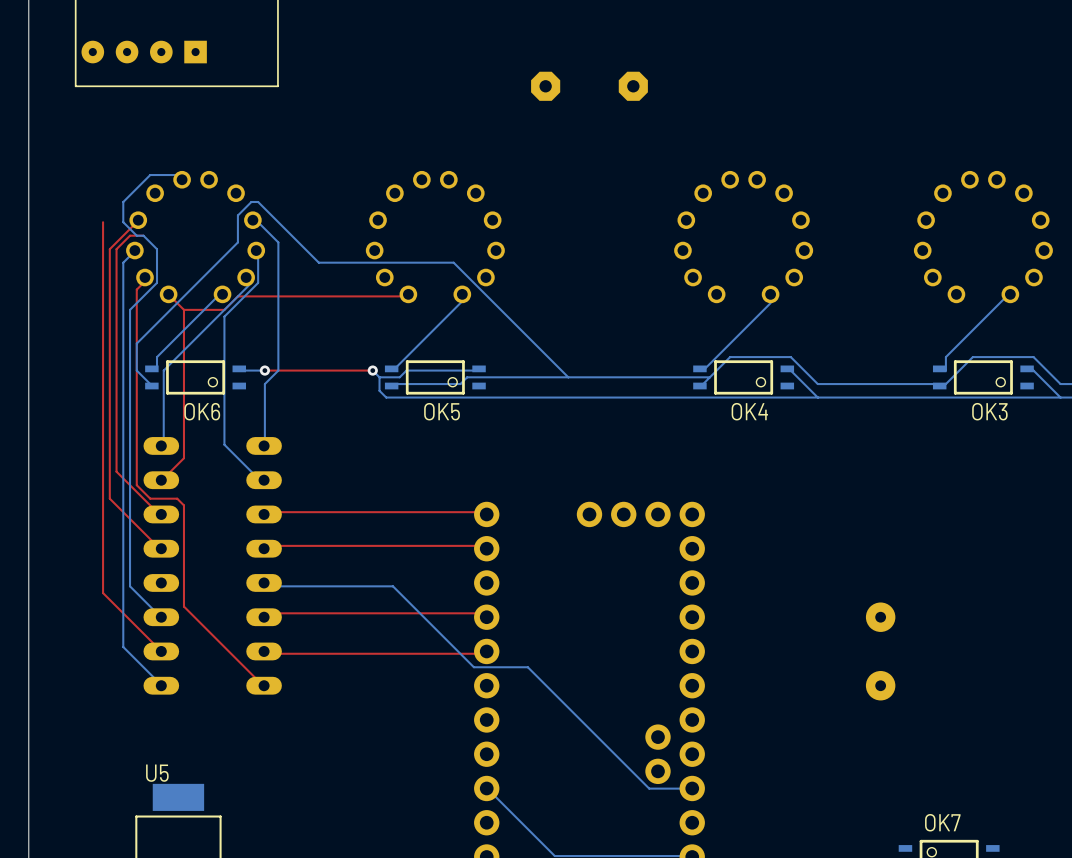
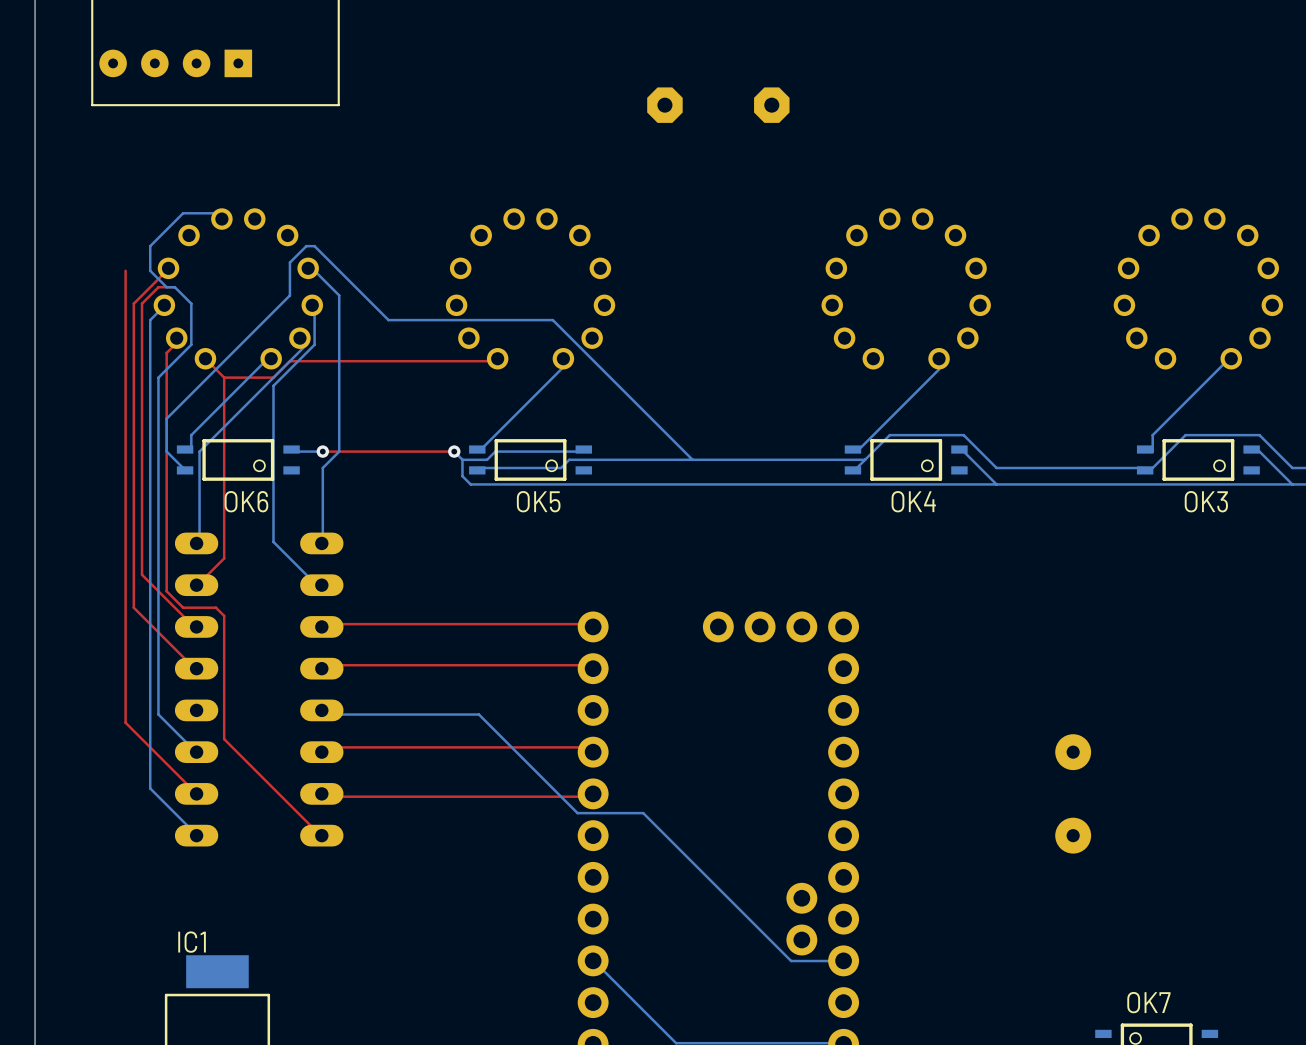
U5 name: U5 (157, 773) -> IC1 (192, 942)

